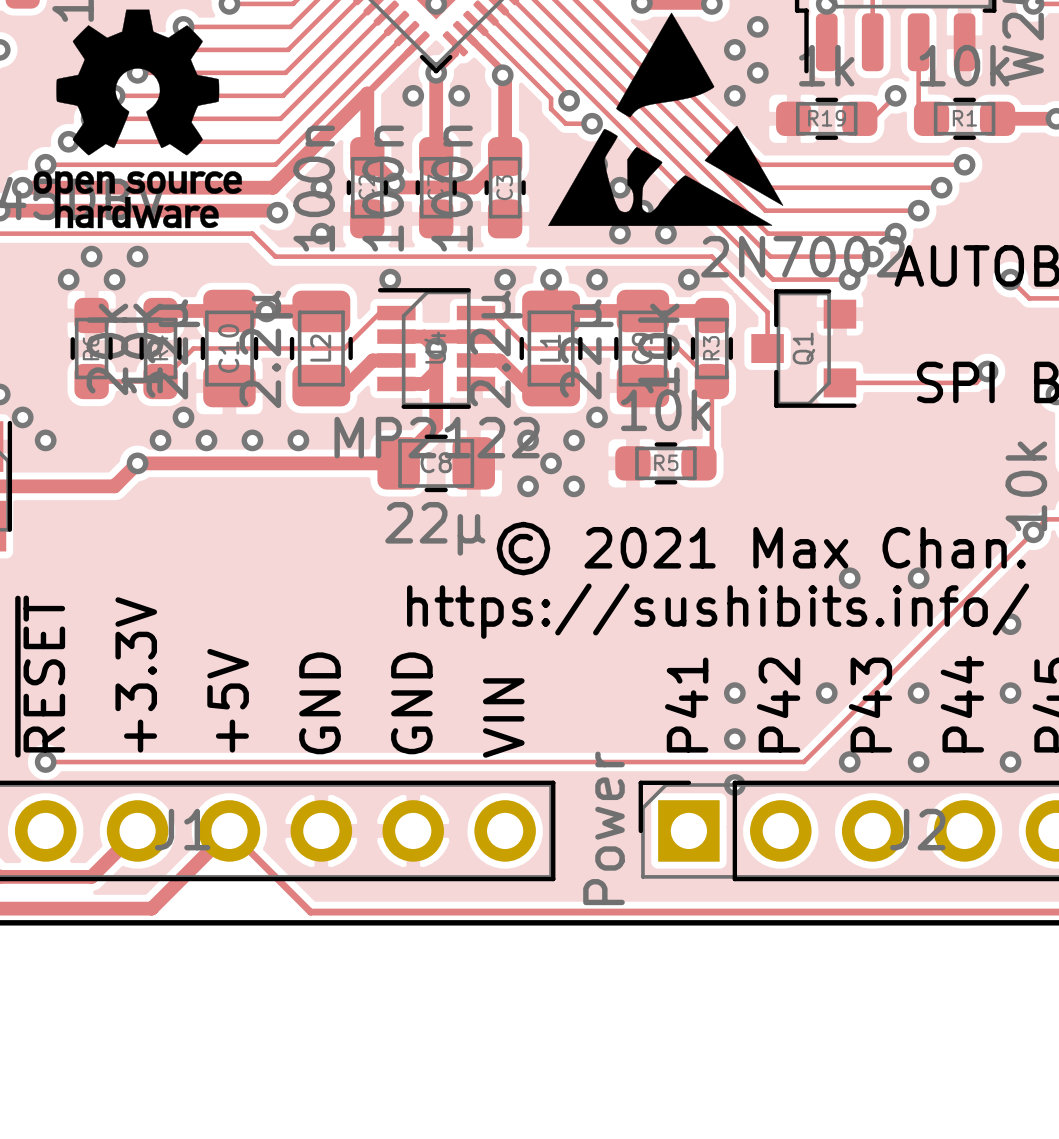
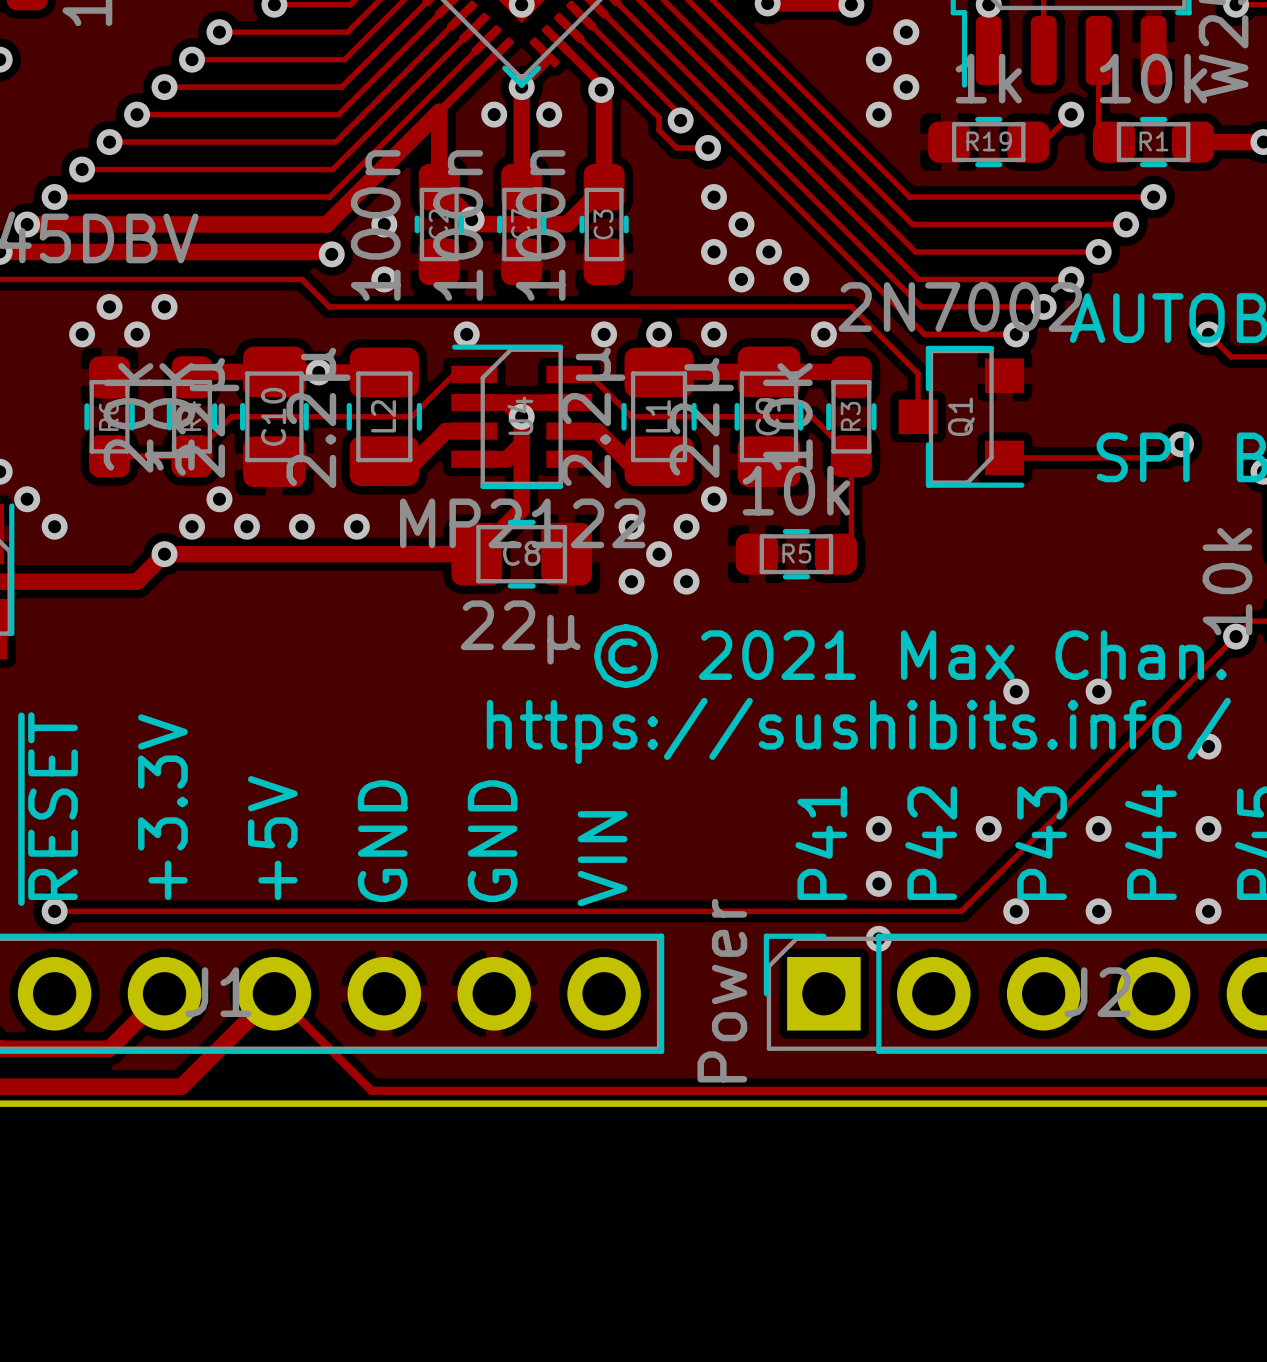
drawing: [33, 9, 242, 229] -> none
drawing: [548, 12, 784, 226] -> none

